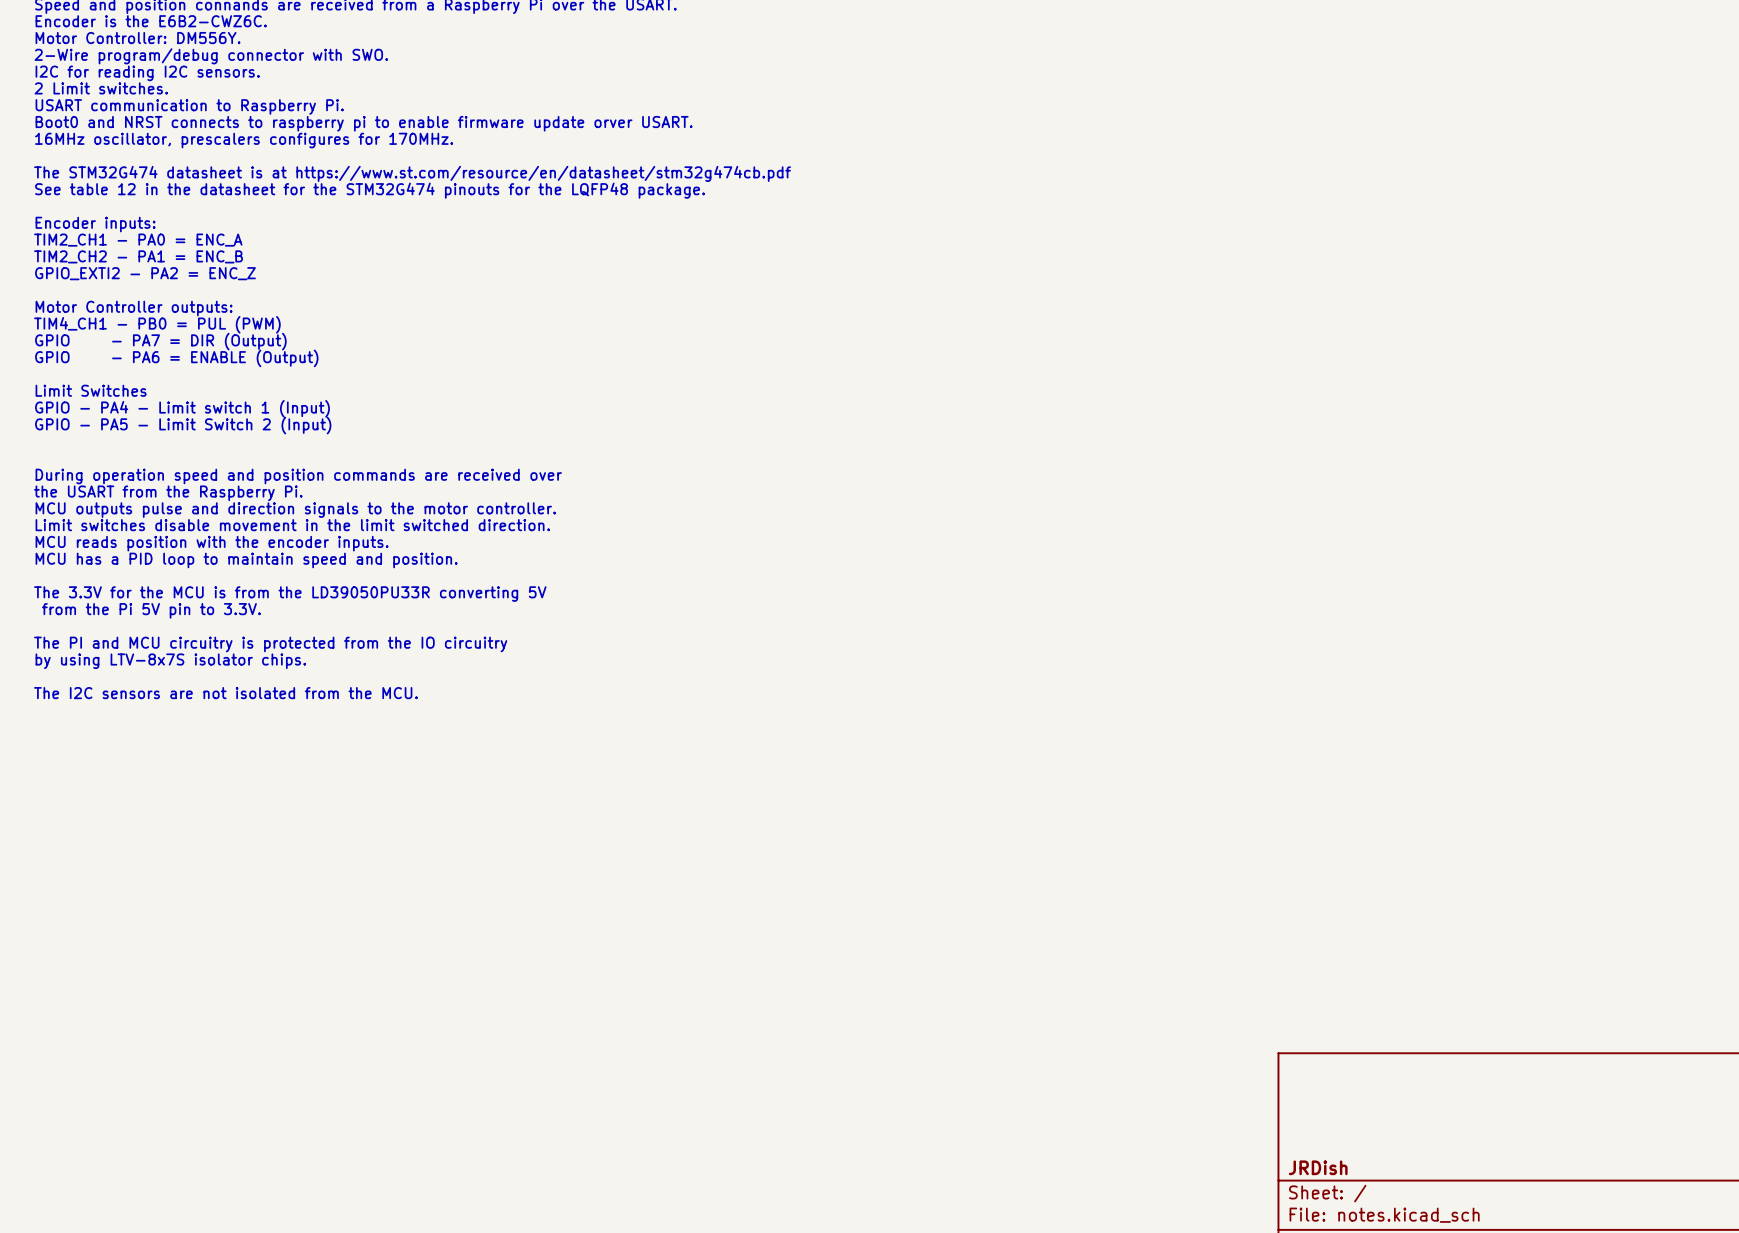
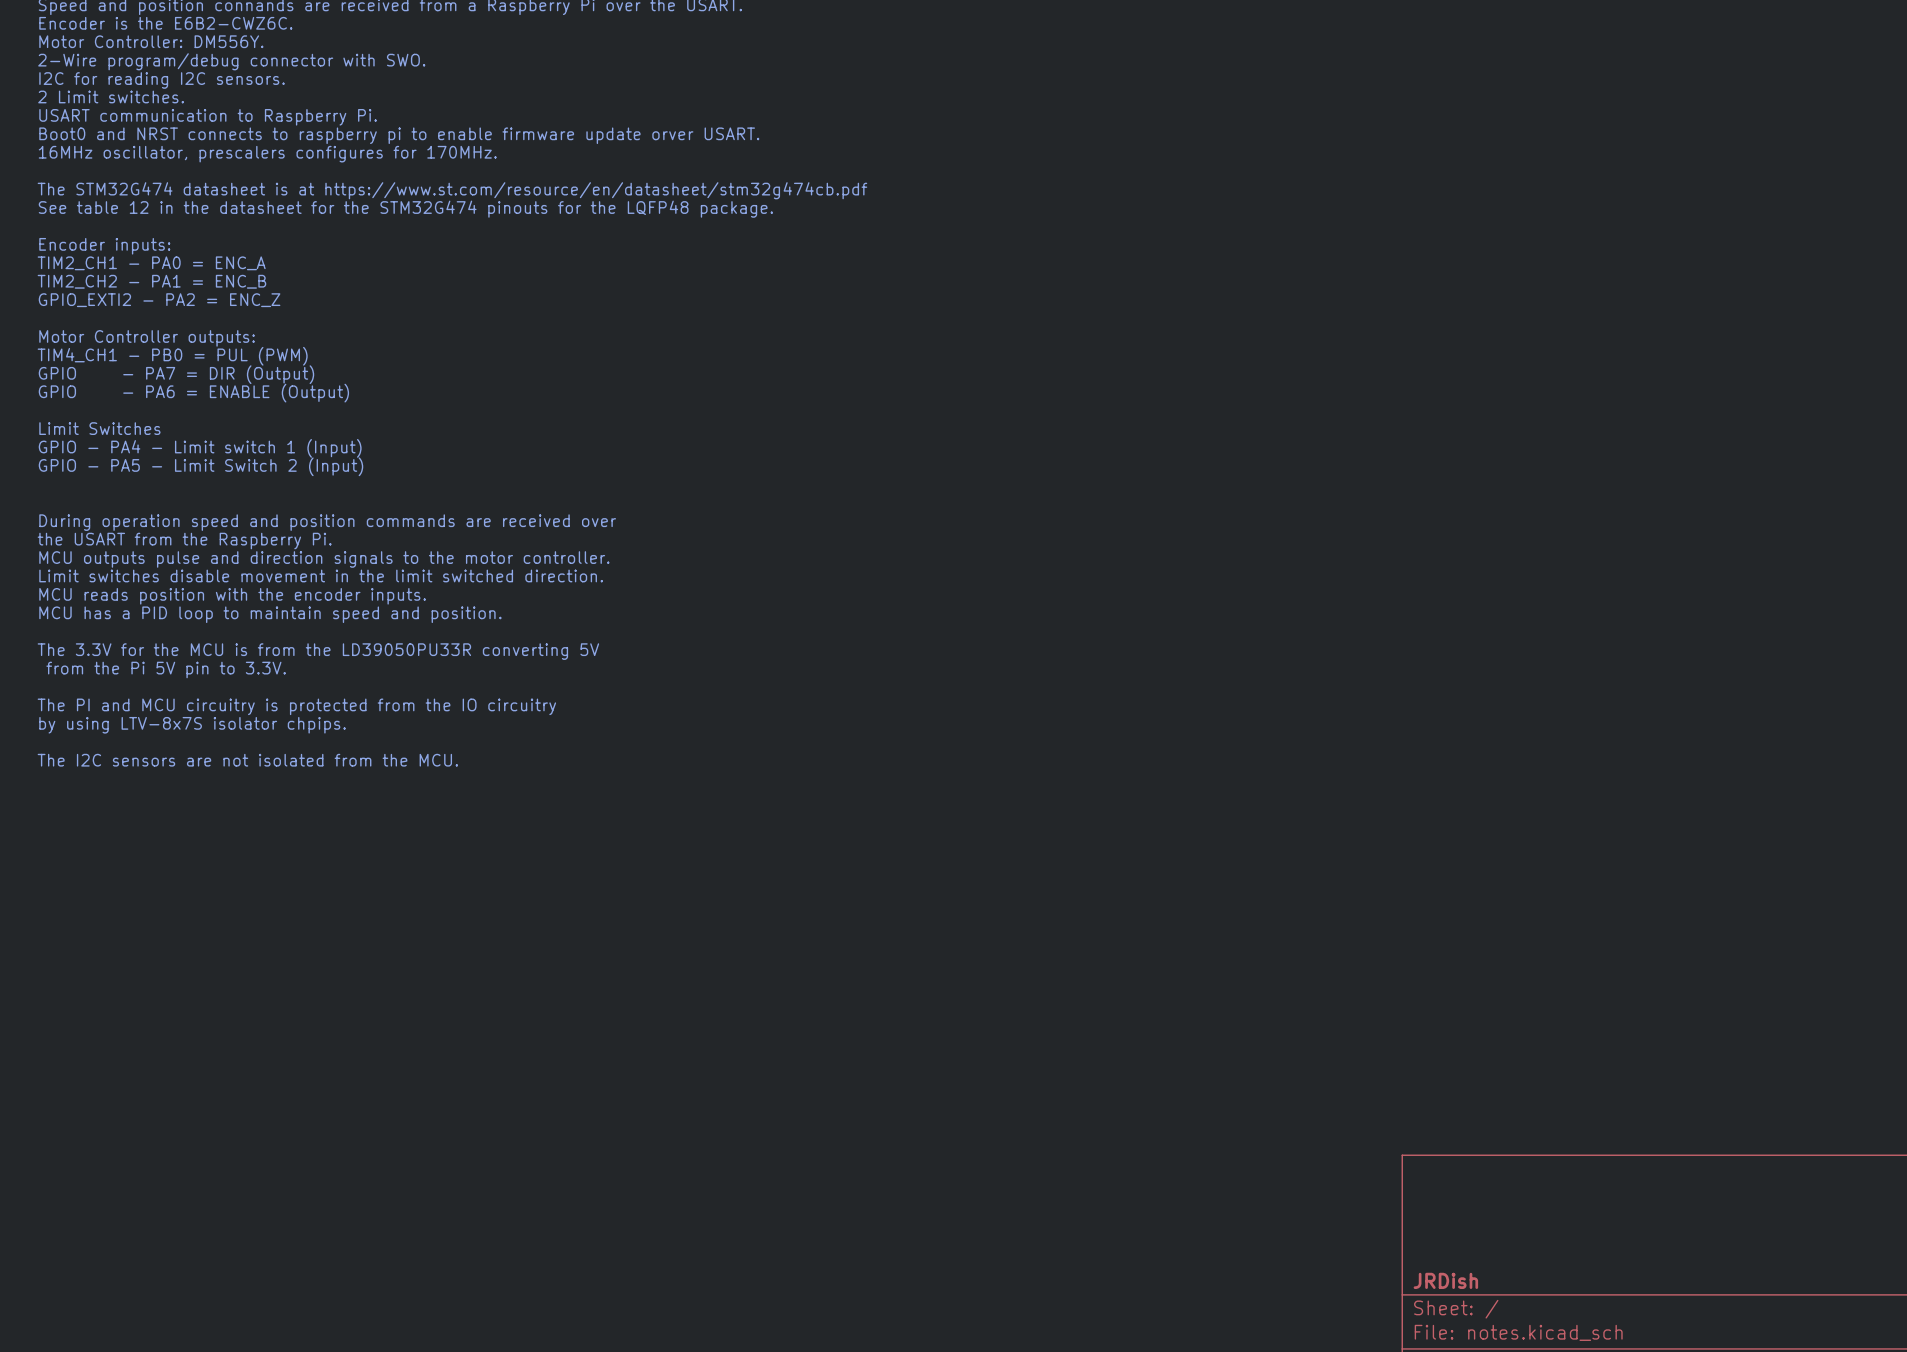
text: by using LTV-8x7S isolator chips. (170, 661) -> by using LTV-8x7S isolator chpips. (192, 725)

